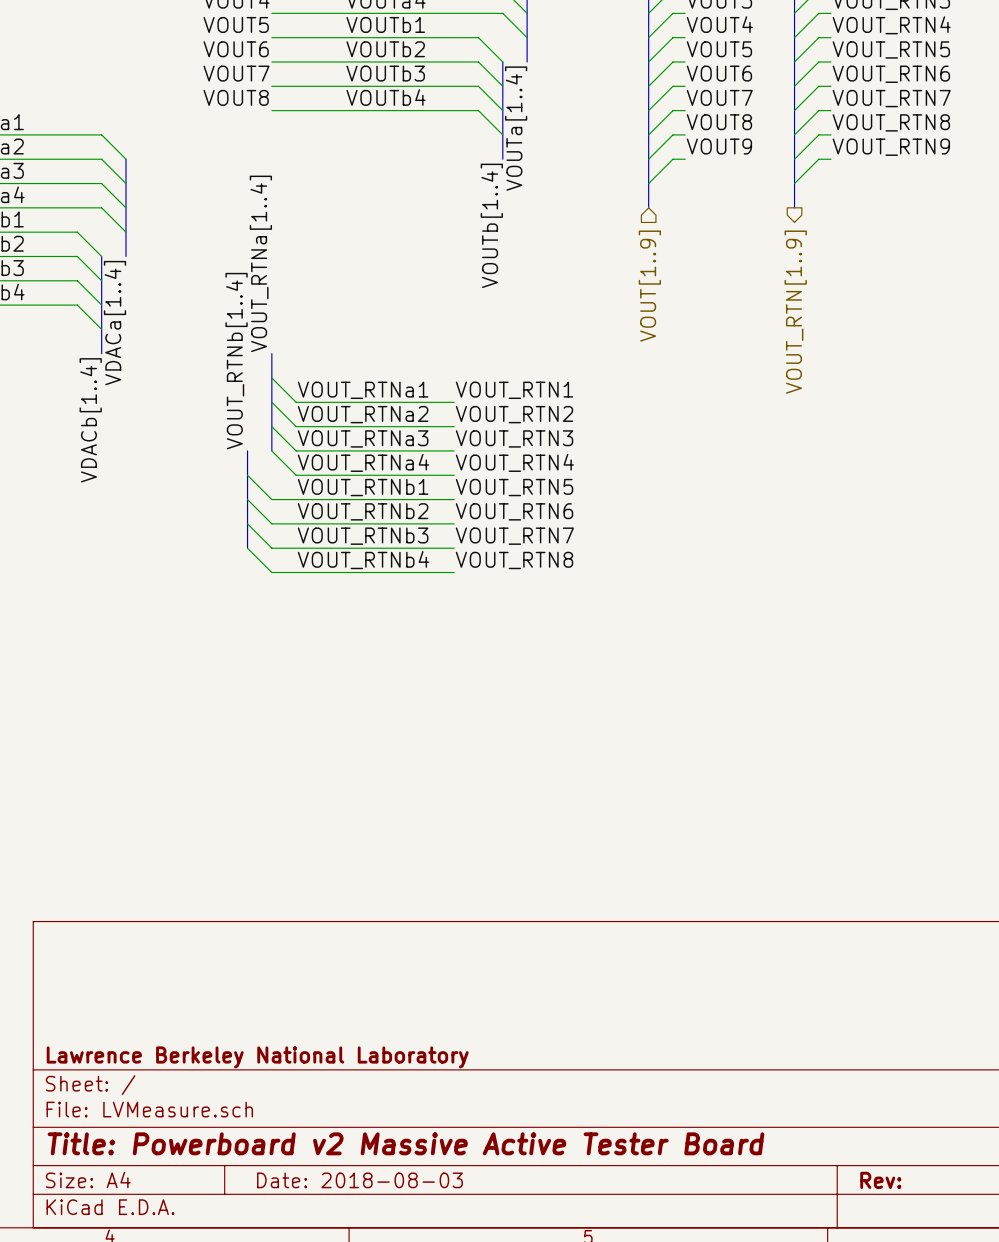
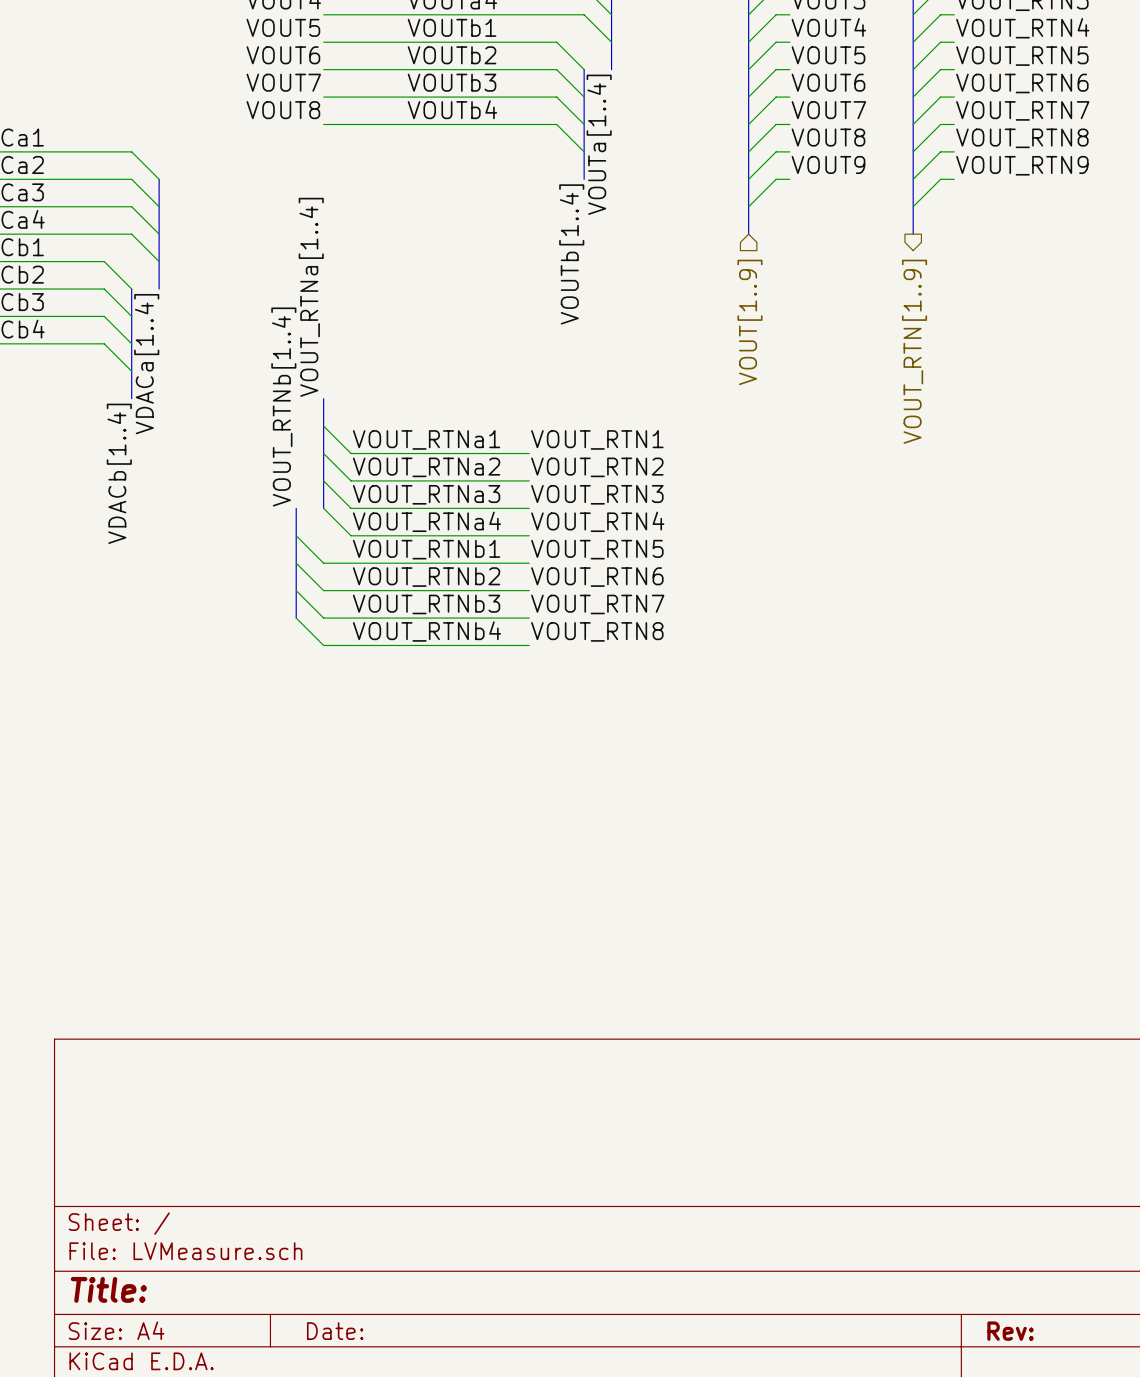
title block: Lawrence Berkeley National Laboratory (257, 1057) -> none
title block: Title: Powerboard v2 Massive Active Tester Board (405, 1143) -> Title: (108, 1289)
title block: Date: 2018-08-03 (359, 1180) -> Date: (335, 1331)

